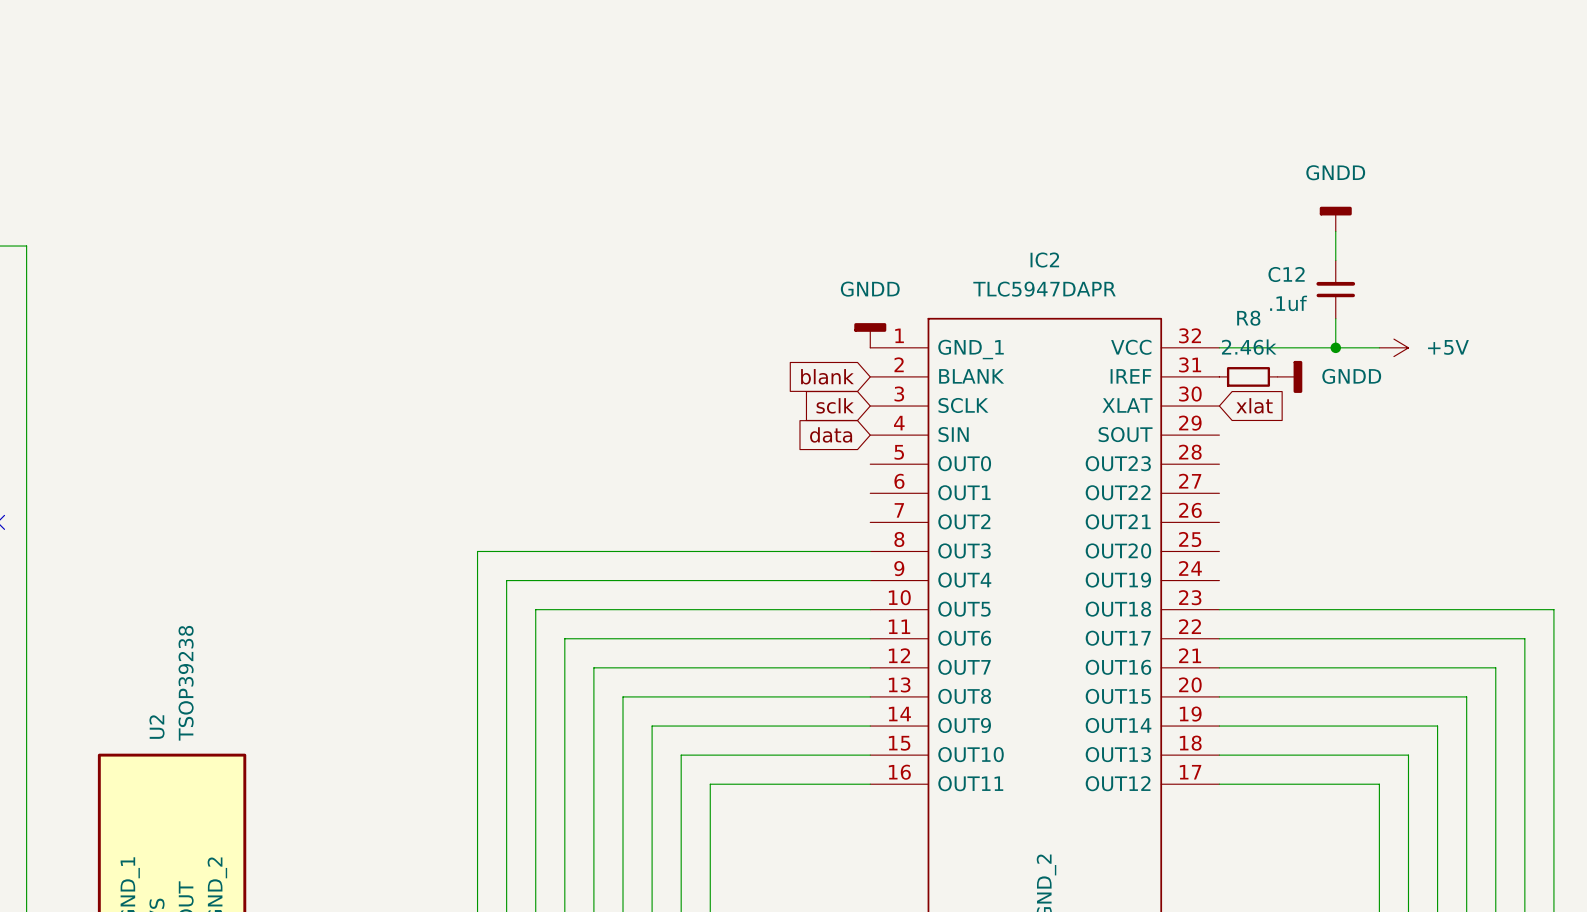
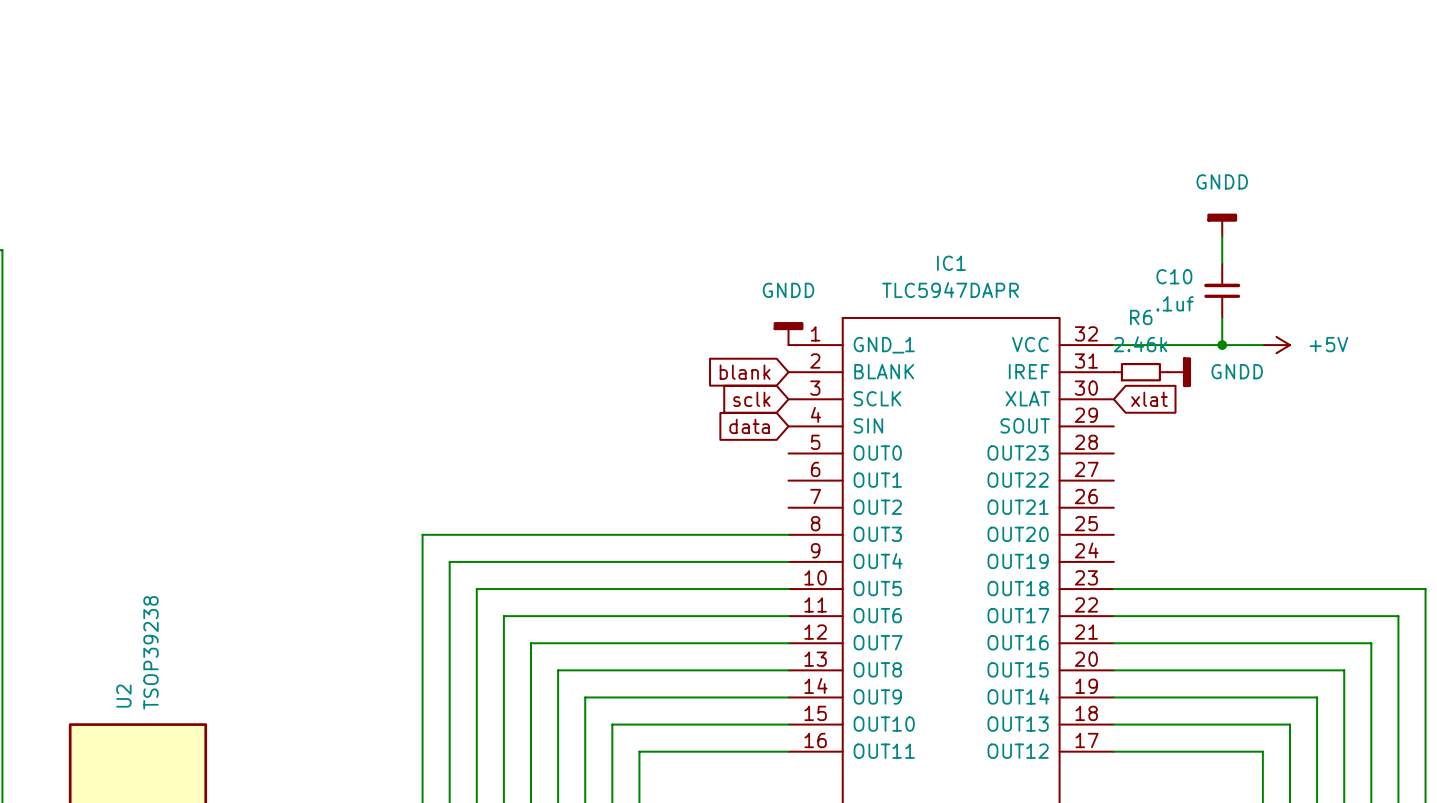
IC2 name: IC2 (1044, 260) -> IC1 (951, 263)
C12 name: C12 (1286, 274) -> C10 (1174, 276)
R8 name: R8 (1248, 318) -> R6 (1141, 317)

